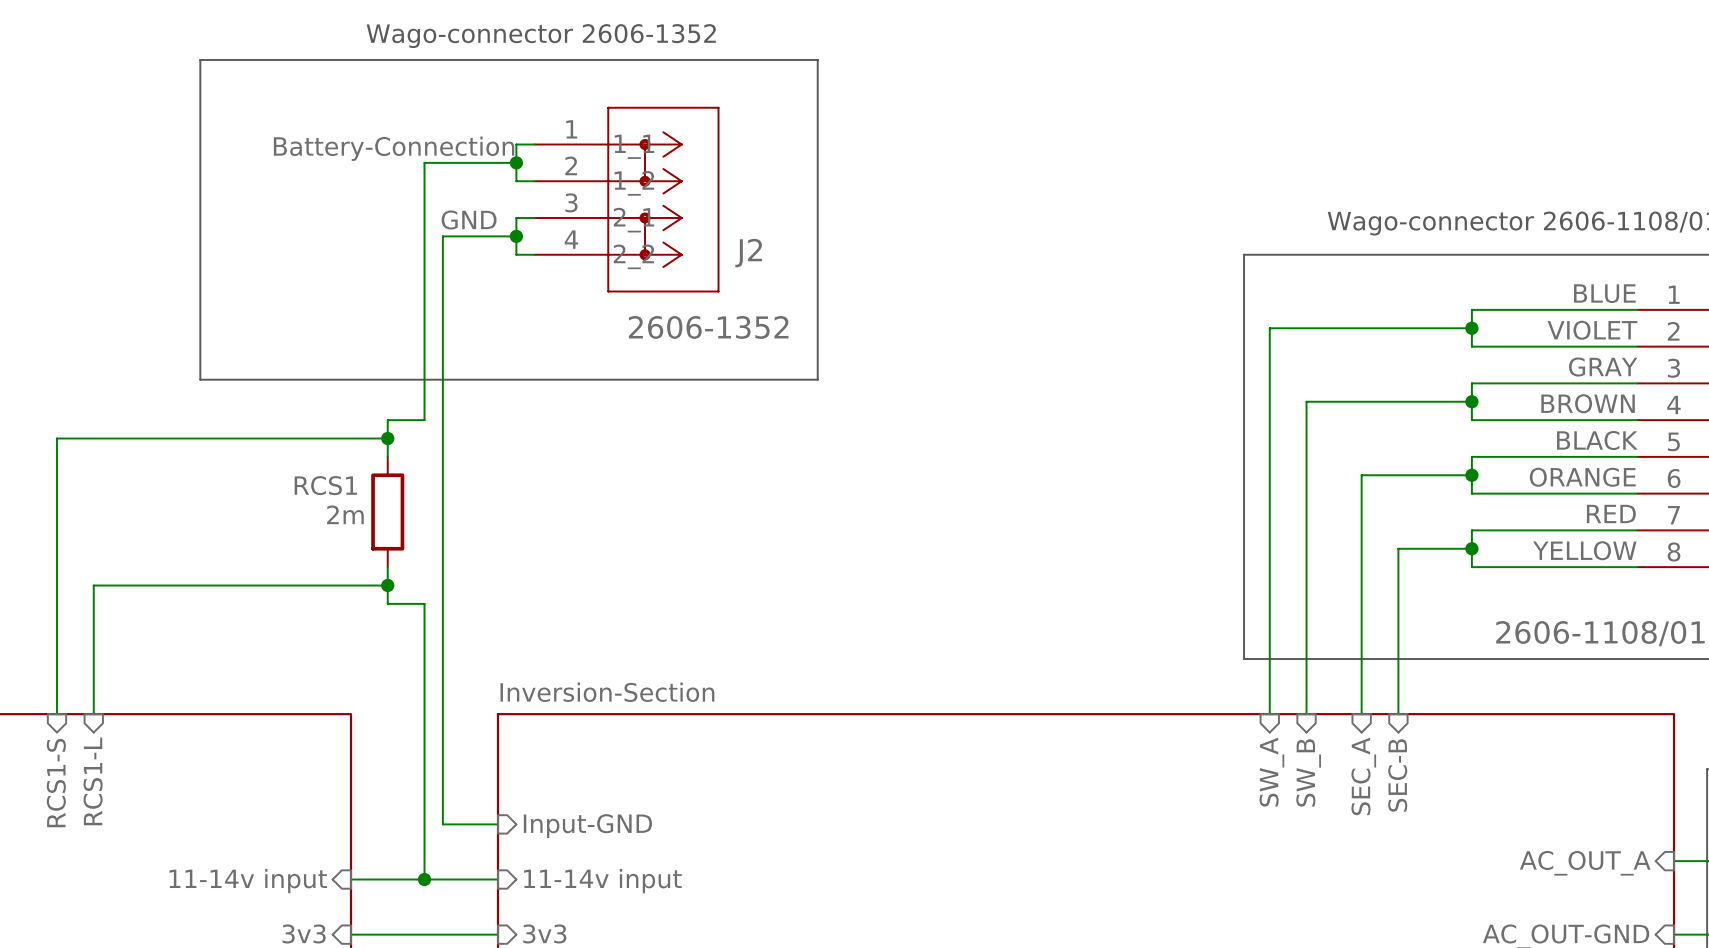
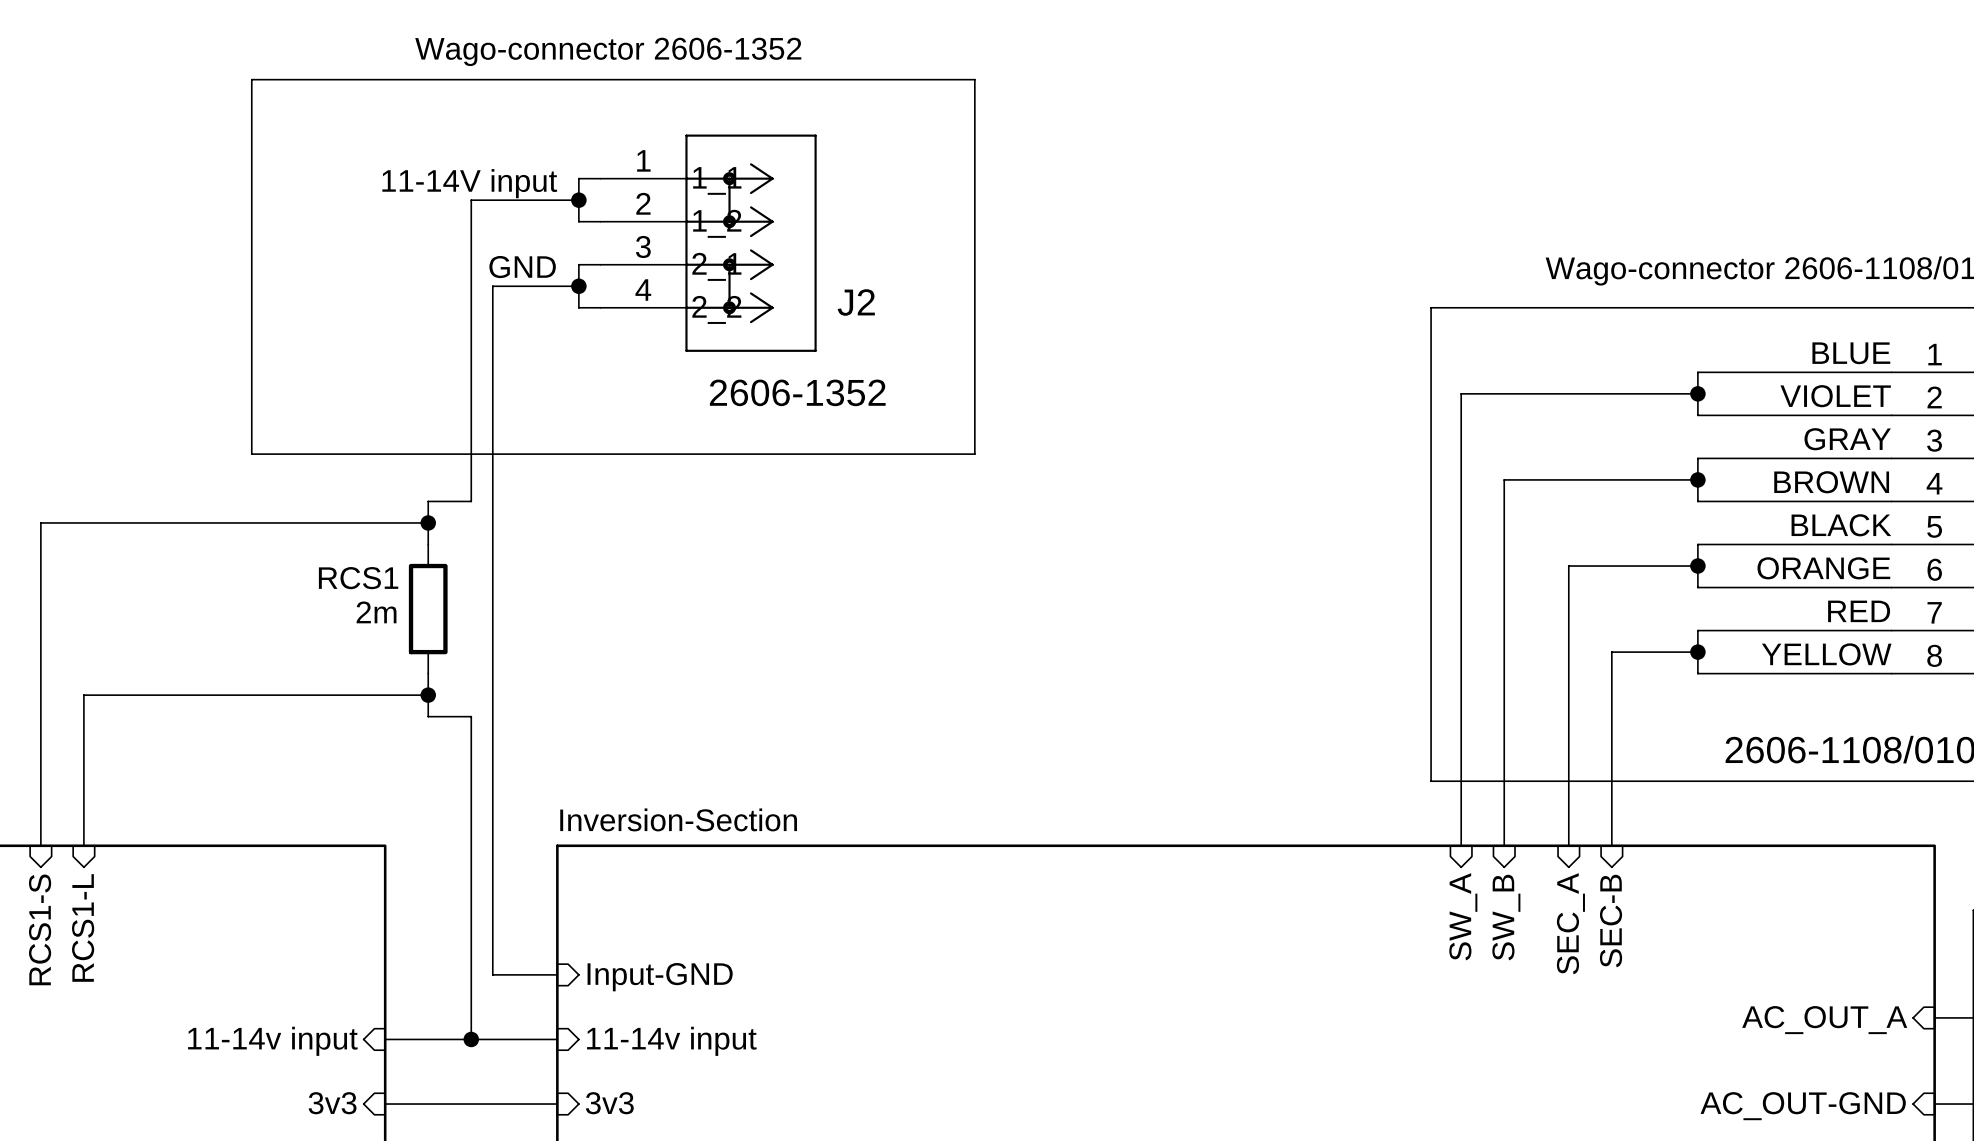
line: (237, 59) (200, 59) (200, 379) (237, 379) -> (251, 79) (251, 454)
line: (817, 59) (817, 379) -> (931, 79) (974, 79) (974, 454) (931, 454)
label: Battery-Connection (394, 148) -> none
label: none -> 11-14V input (469, 183)

